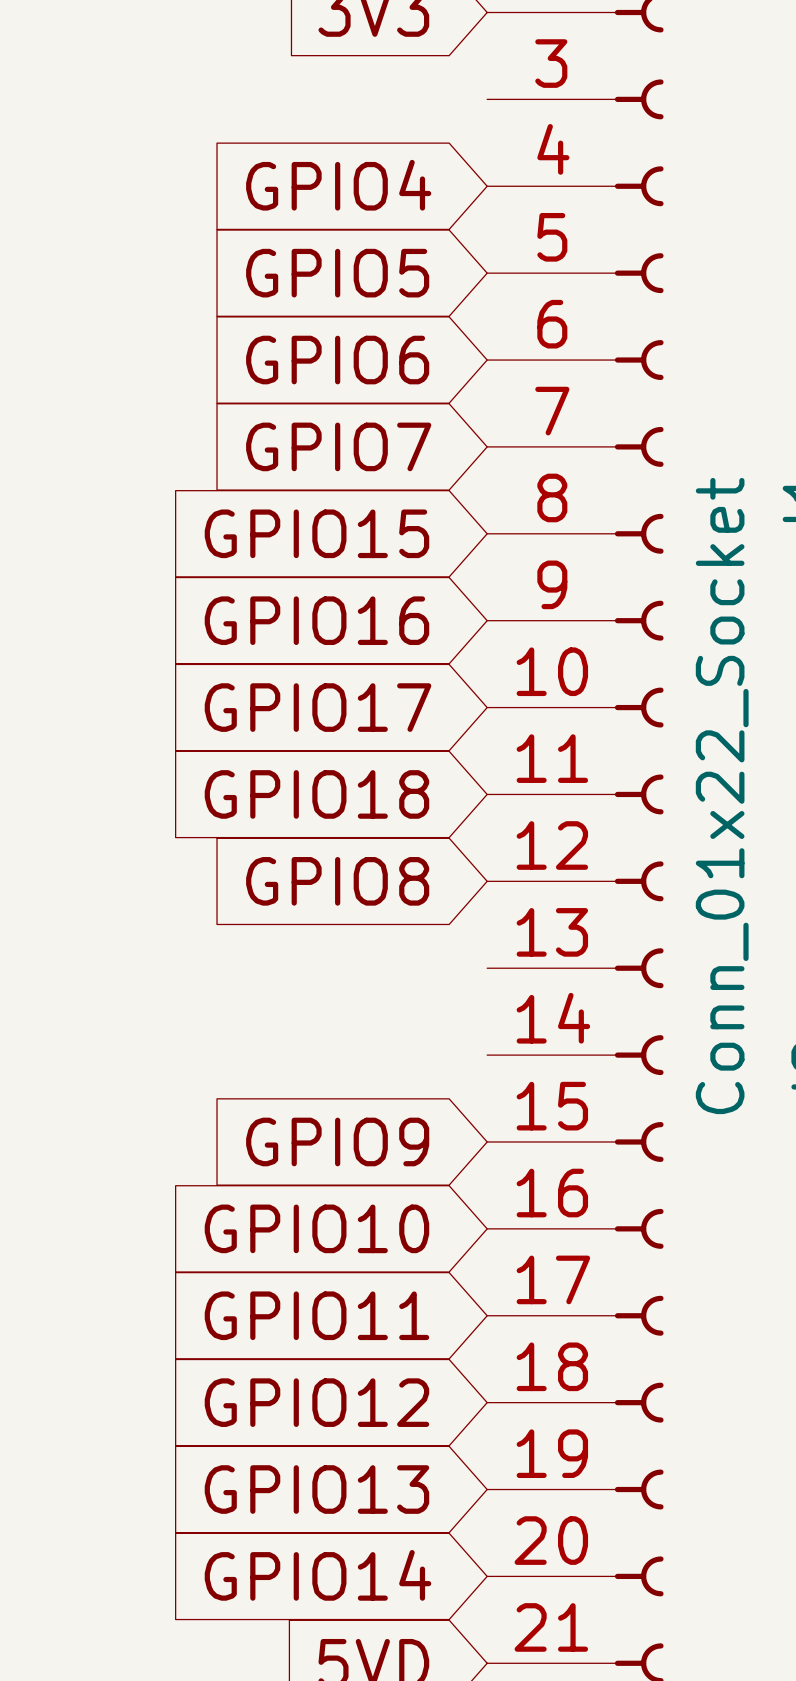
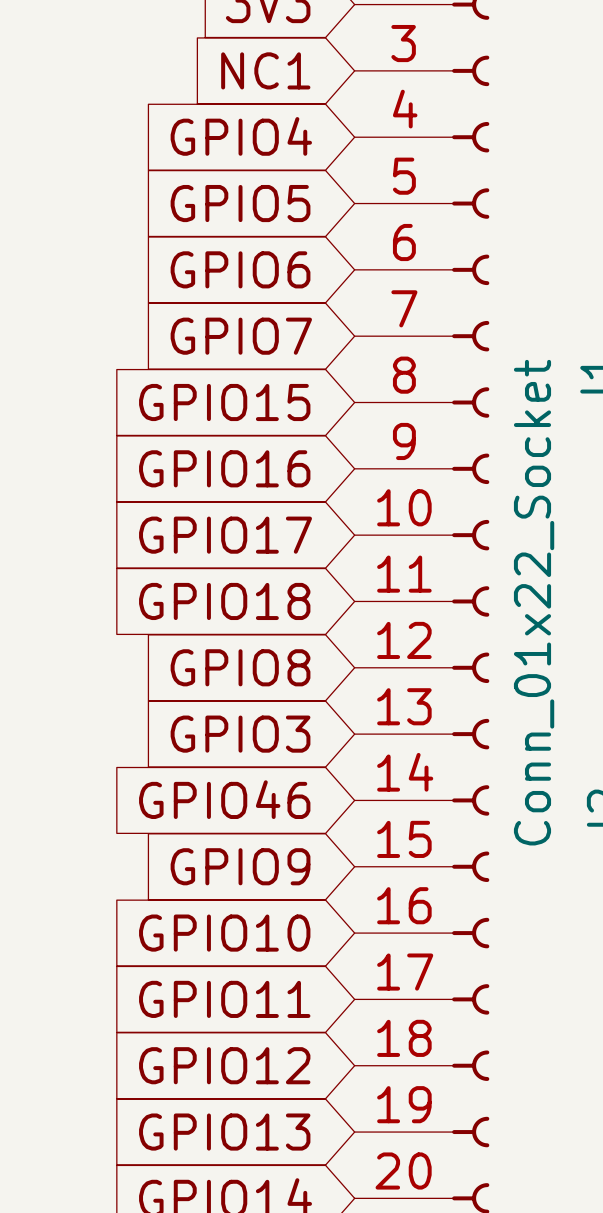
global label: none -> NC1 (265, 70)
global label: none -> GPIO3 (240, 734)
global label: none -> GPIO46 (224, 799)

